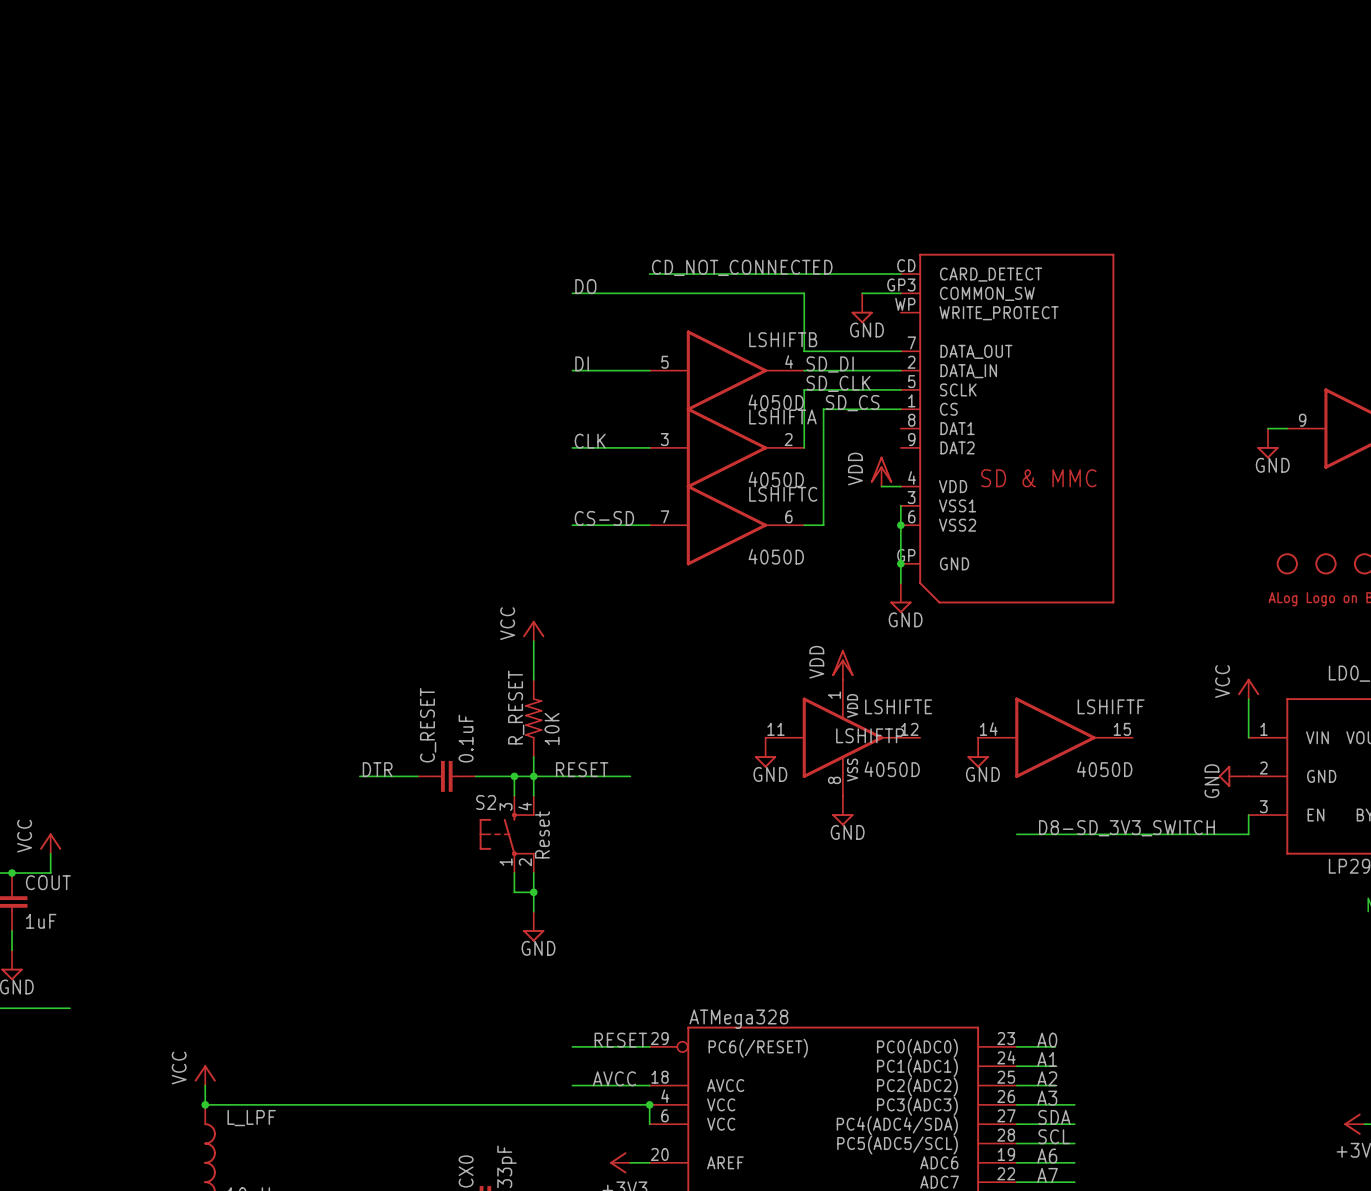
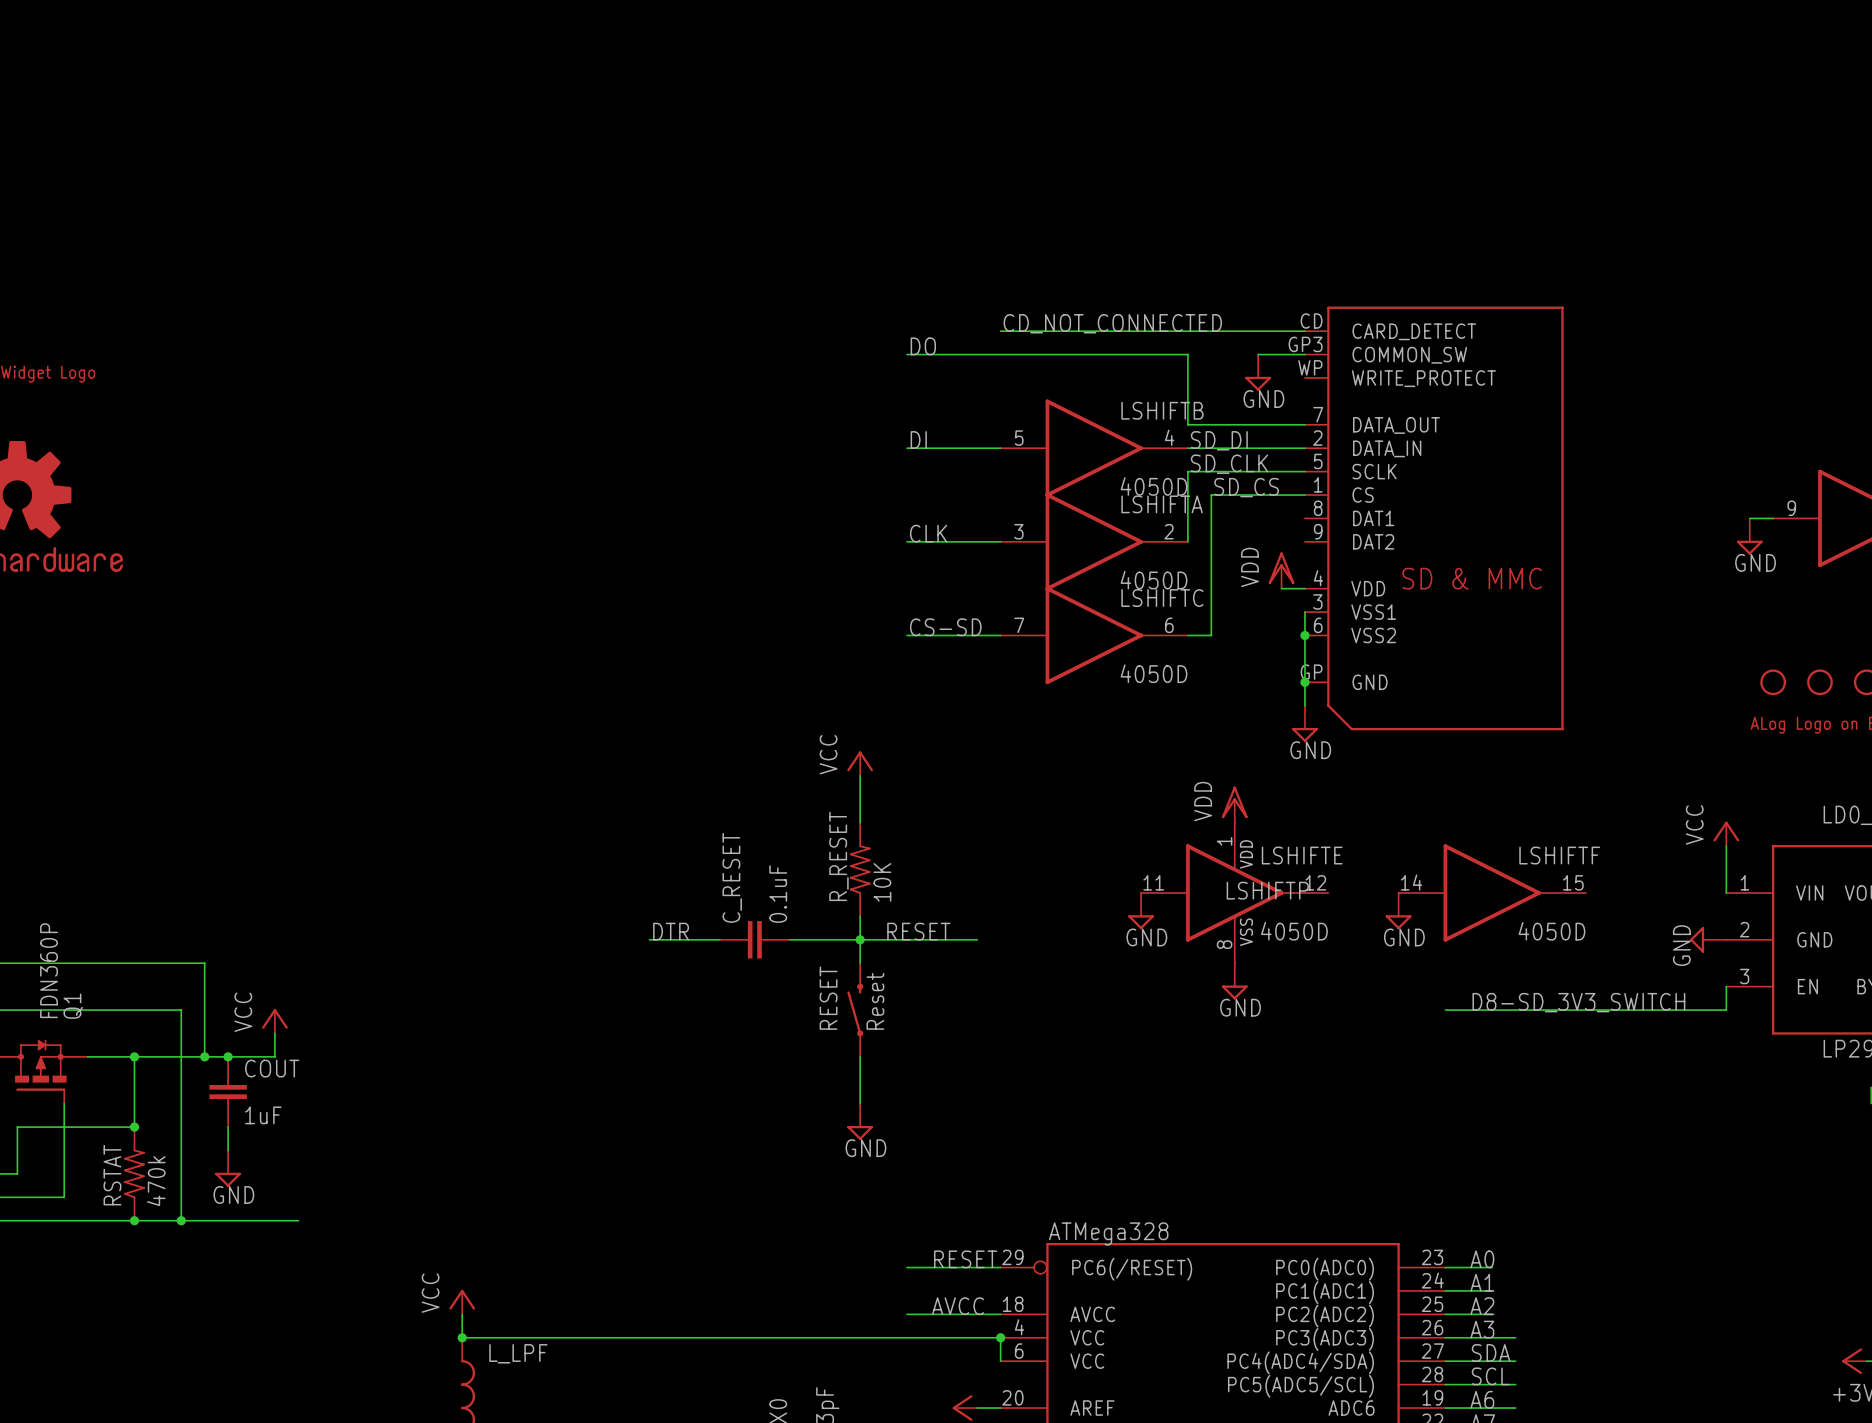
wire: (514, 776) (514, 795) -> none
junction: (514, 776) -> none
S2: Reset (506, 834) -> none
RESET: none -> Reset (855, 1010)
wire: (514, 873) (514, 892) (533, 892) -> none
junction: (533, 892) -> none

